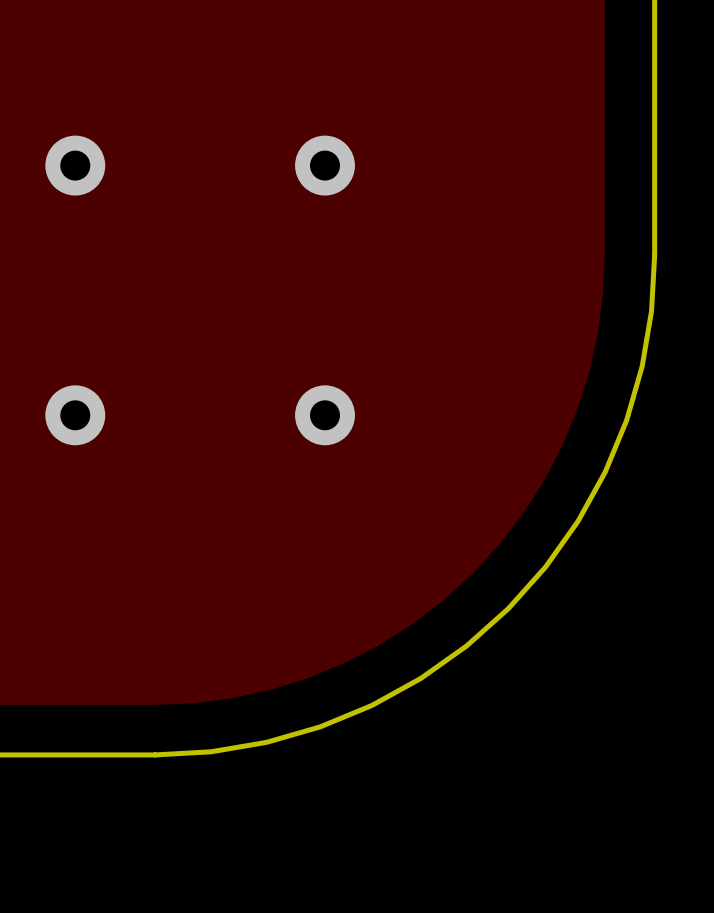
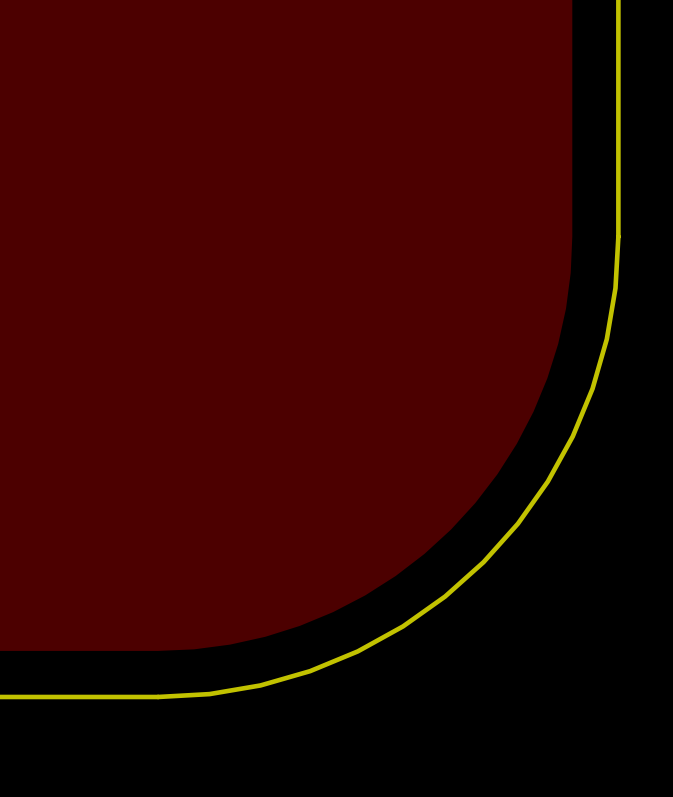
via: (75, 165) -> none
via: (325, 165) -> none
via: (75, 415) -> none
via: (325, 415) -> none

